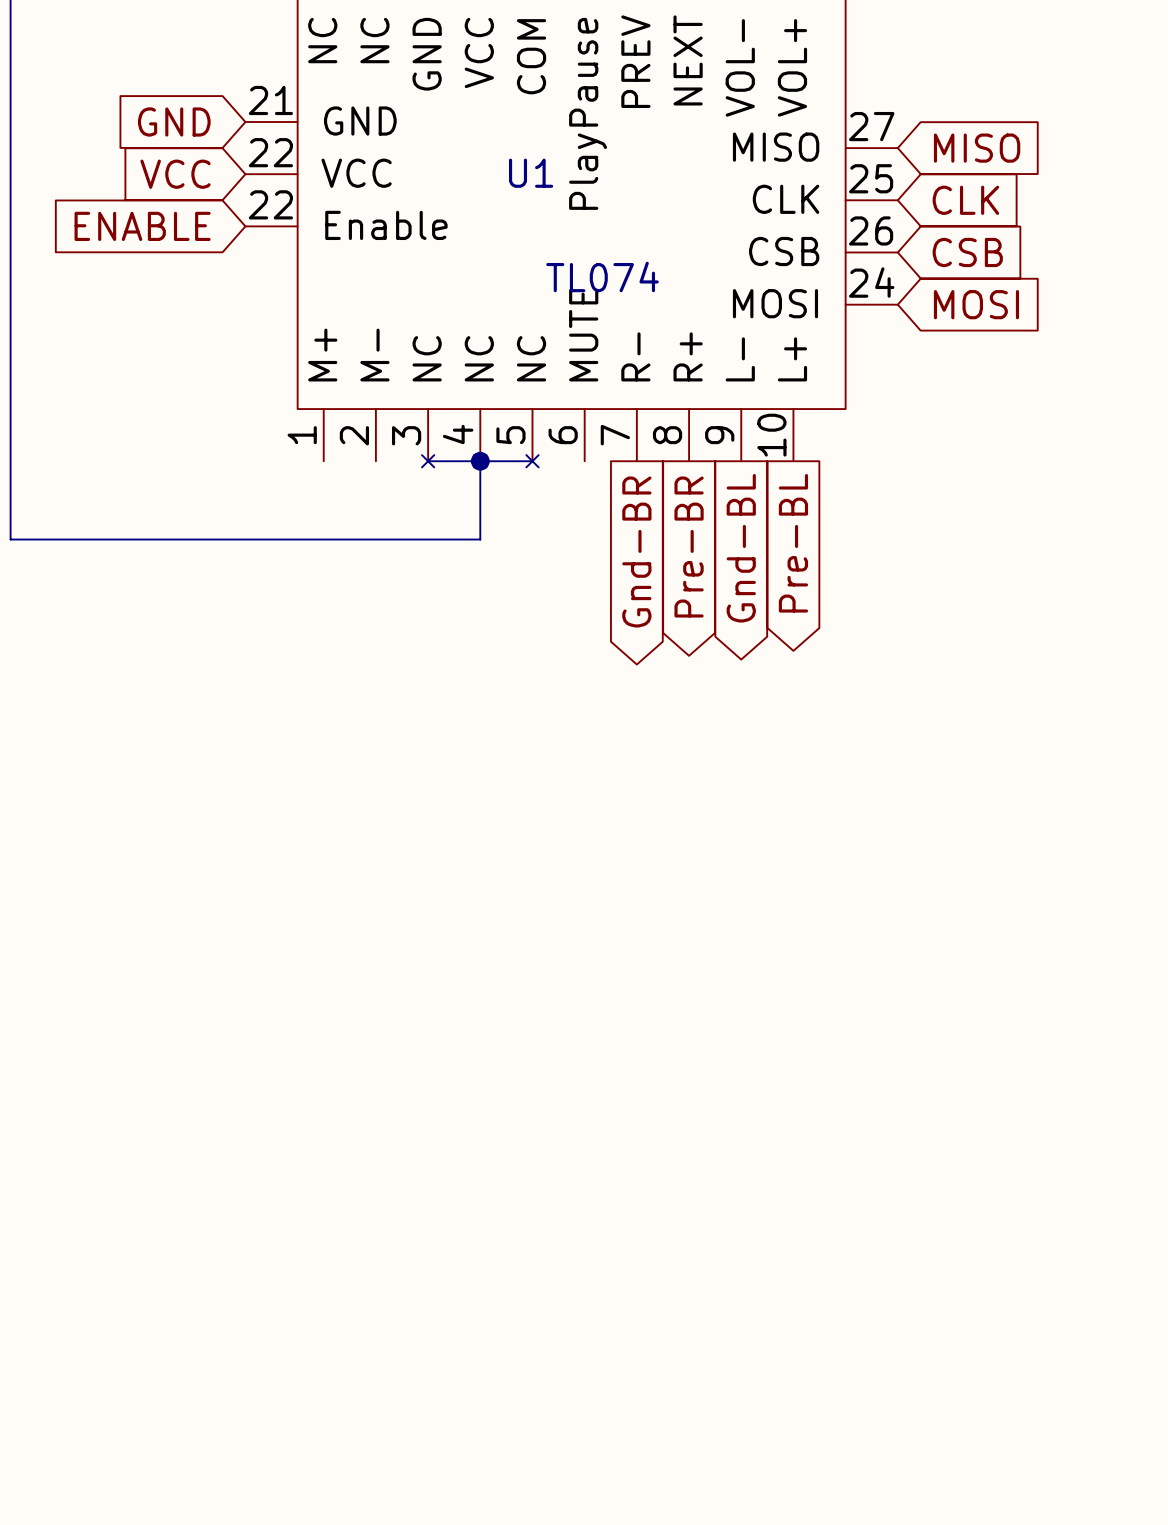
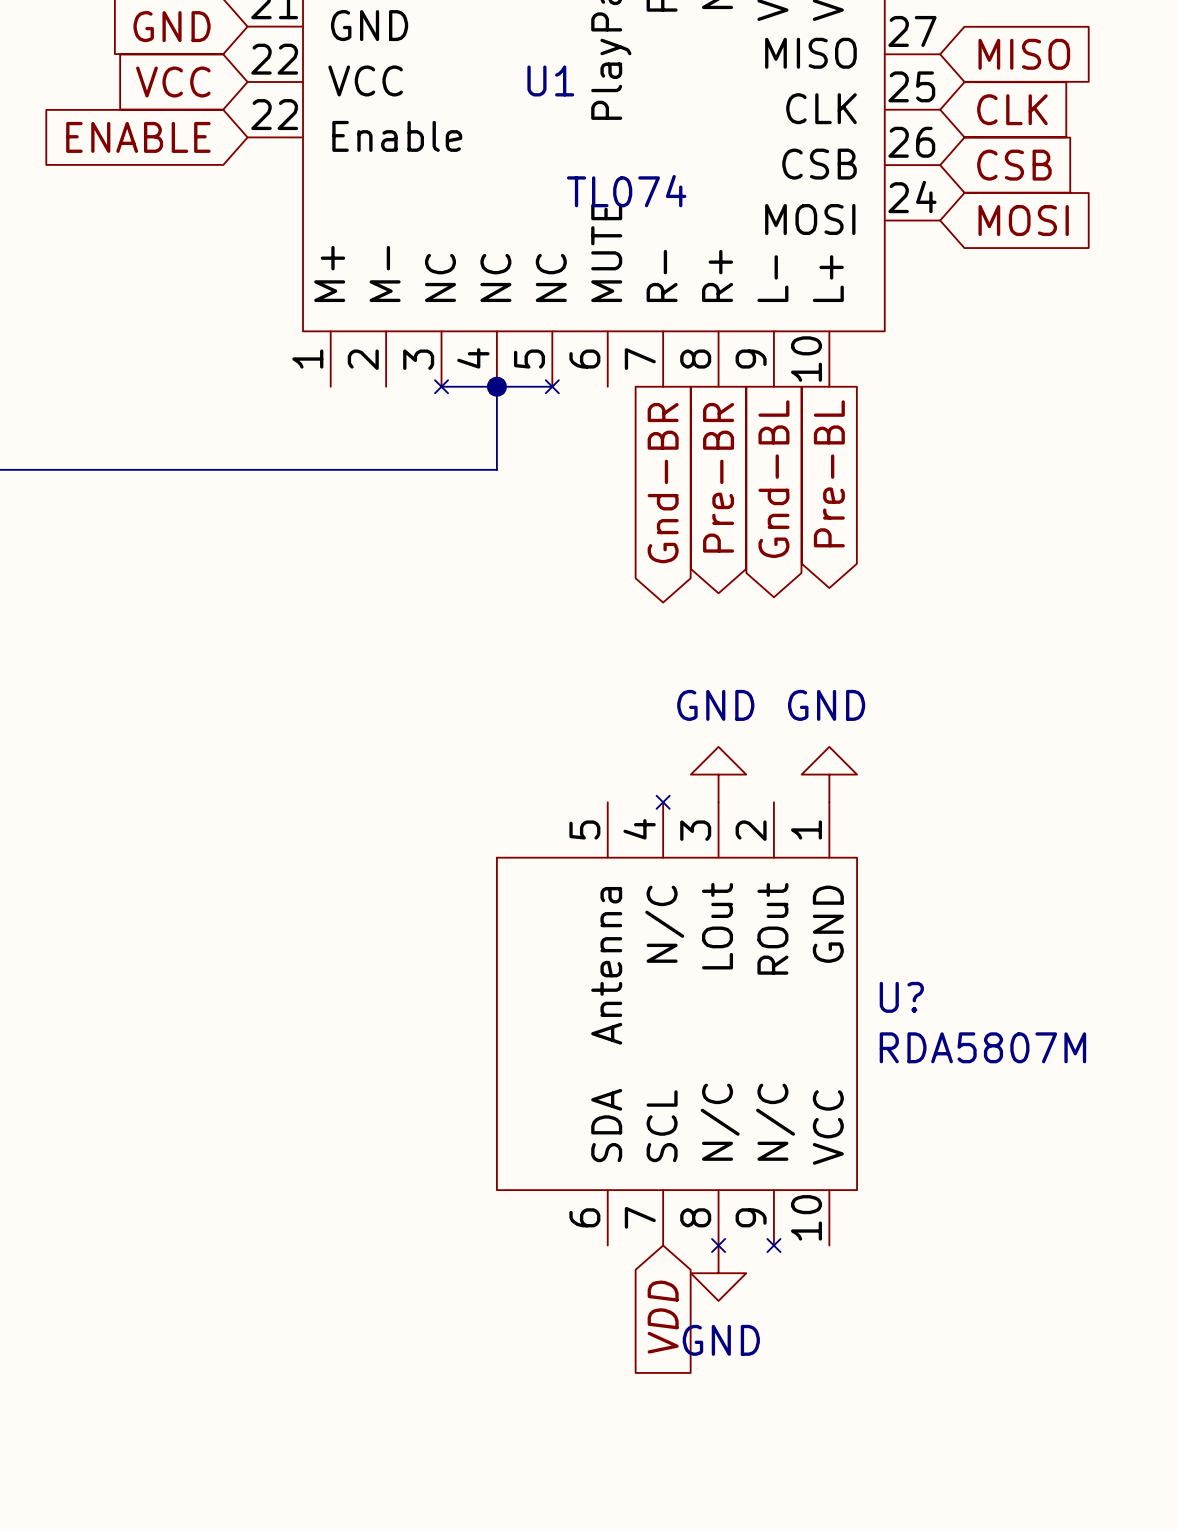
power symbol: none -> GND (718, 774)
power symbol: none -> GND (829, 774)
U?: none -> RDA5807M (676, 1023)
power symbol: none -> GND (718, 1273)
global label: none -> VDD (663, 1317)

